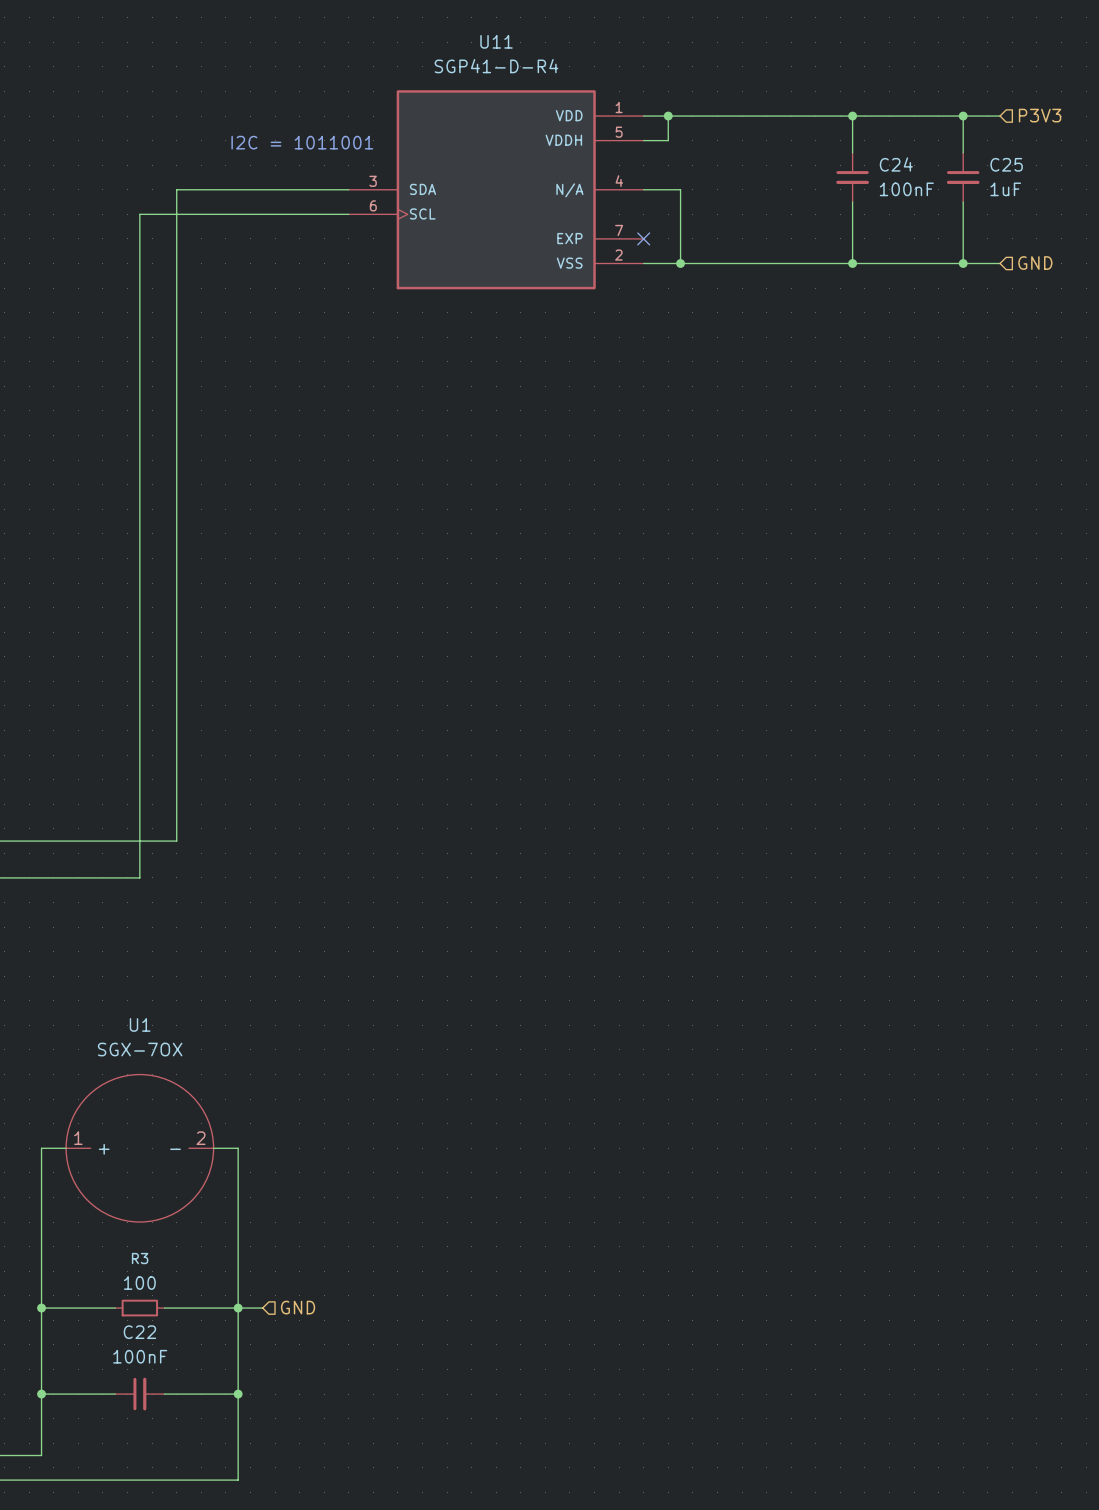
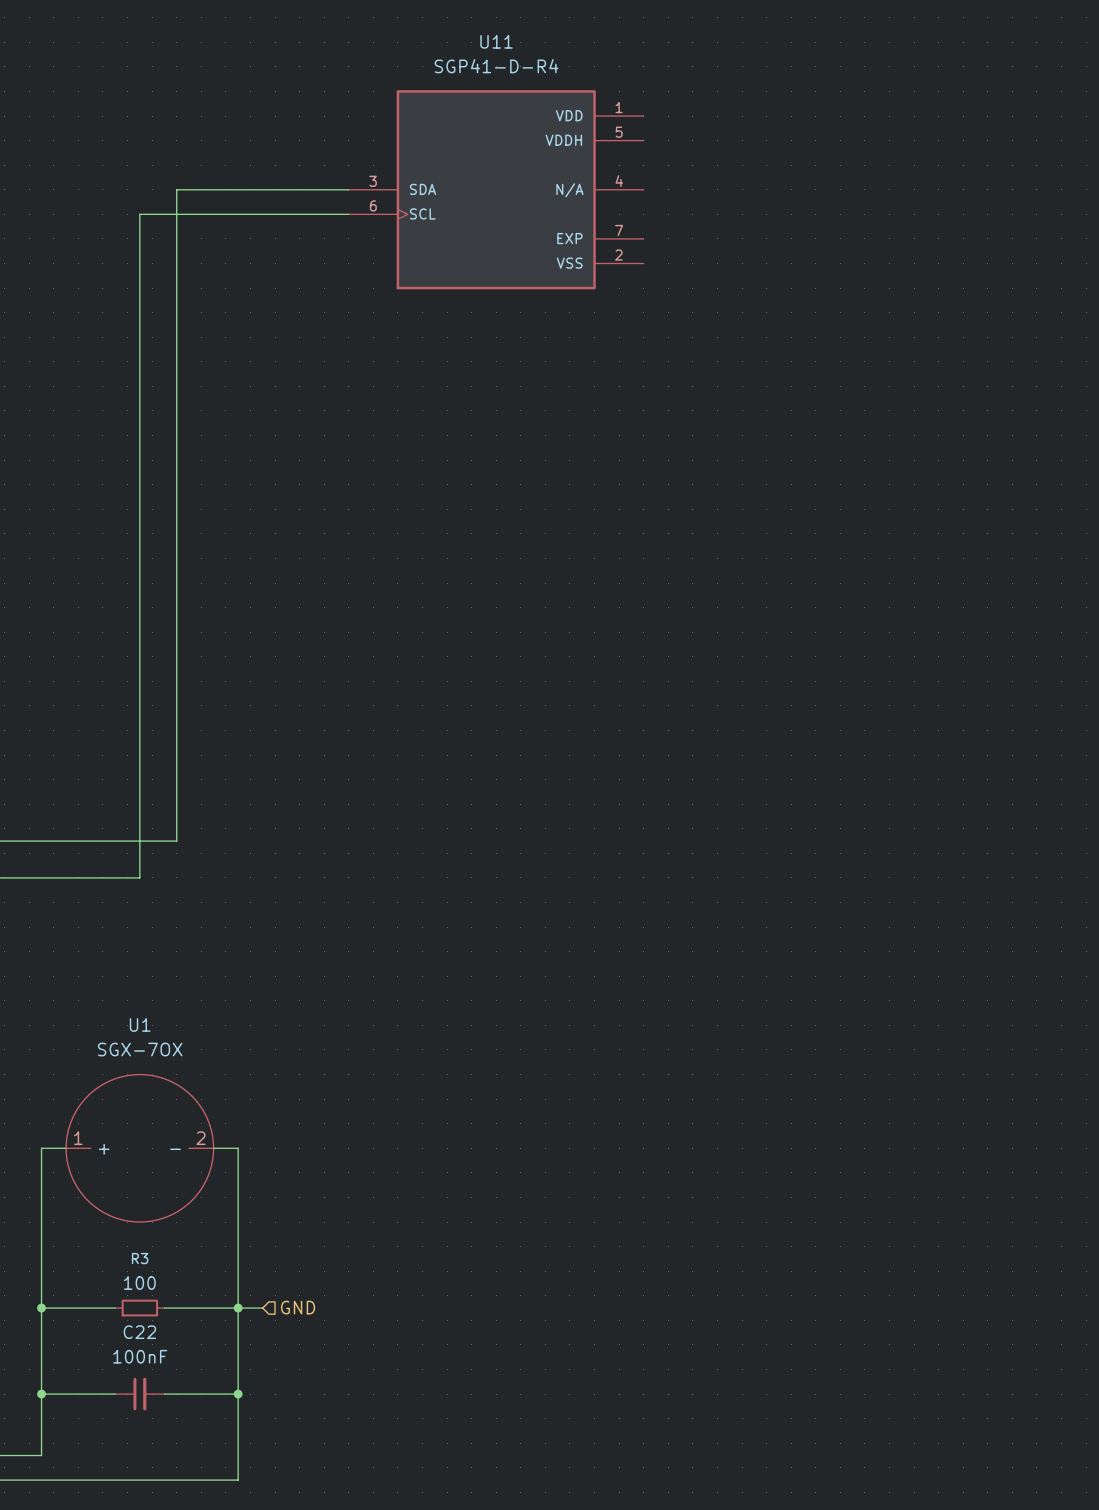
hierarchical label: P3V3 (1040, 115) -> none
wire: (643, 116) (1000, 116) -> none
wire: (668, 116) (668, 140) (643, 140) -> none
junction: (668, 116) -> none
wire: (852, 116) (852, 152) -> none
junction: (852, 116) -> none
wire: (963, 116) (963, 152) -> none
junction: (963, 116) -> none
text: I2C = 1011001 (302, 142) -> none
C24: 100nF (852, 177) -> none
C25: 1uF (963, 177) -> none
wire: (643, 189) (680, 189) (680, 263) -> none
wire: (852, 202) (852, 263) -> none
wire: (963, 202) (963, 263) -> none
no-connect mark: (643, 238) -> none
wire: (643, 263) (1000, 263) -> none
junction: (680, 263) -> none
junction: (852, 263) -> none
junction: (963, 263) -> none
hierarchical label: GND (1035, 263) -> none

